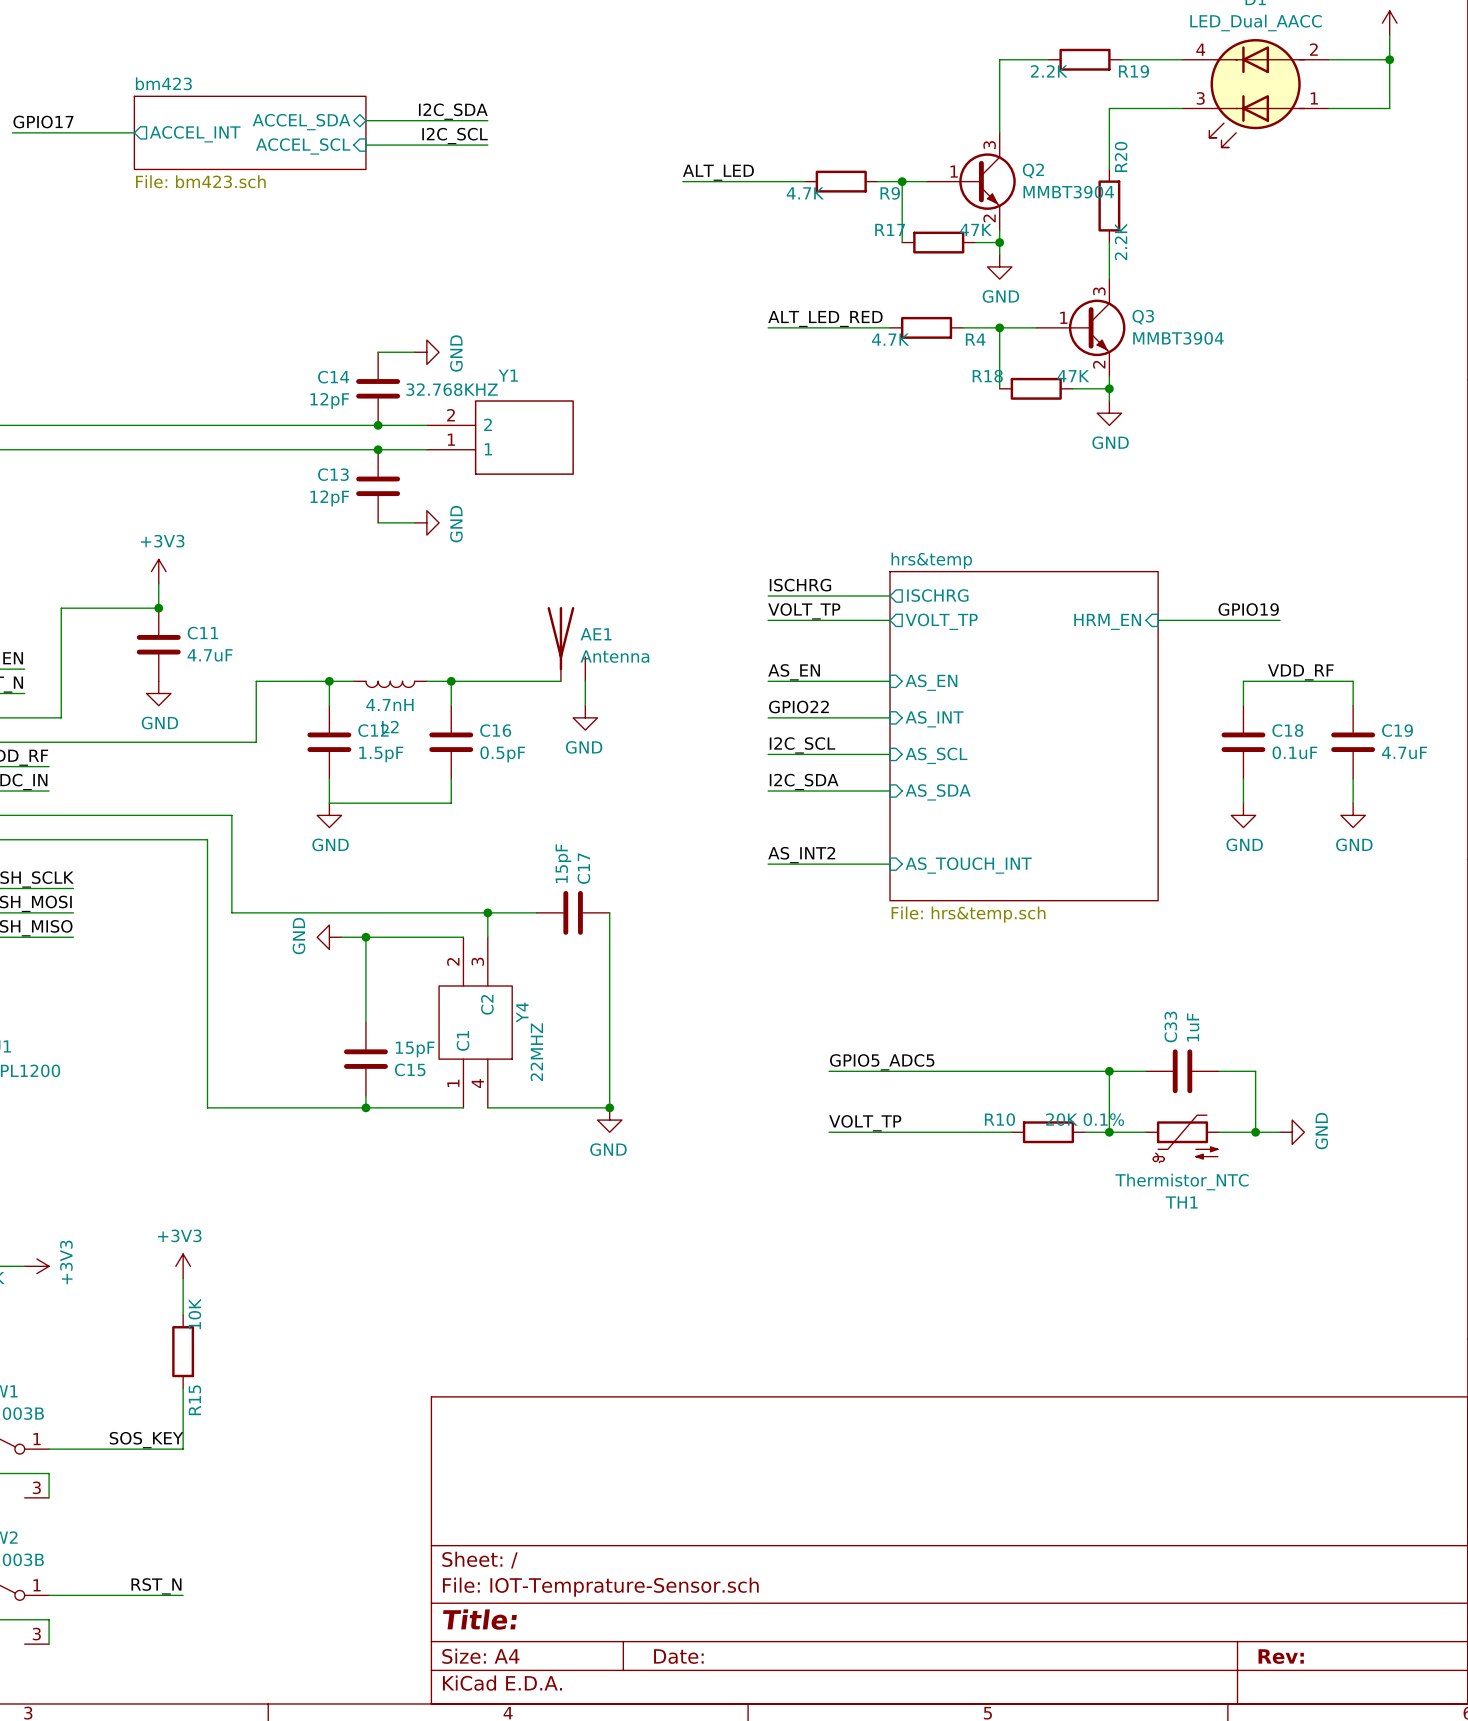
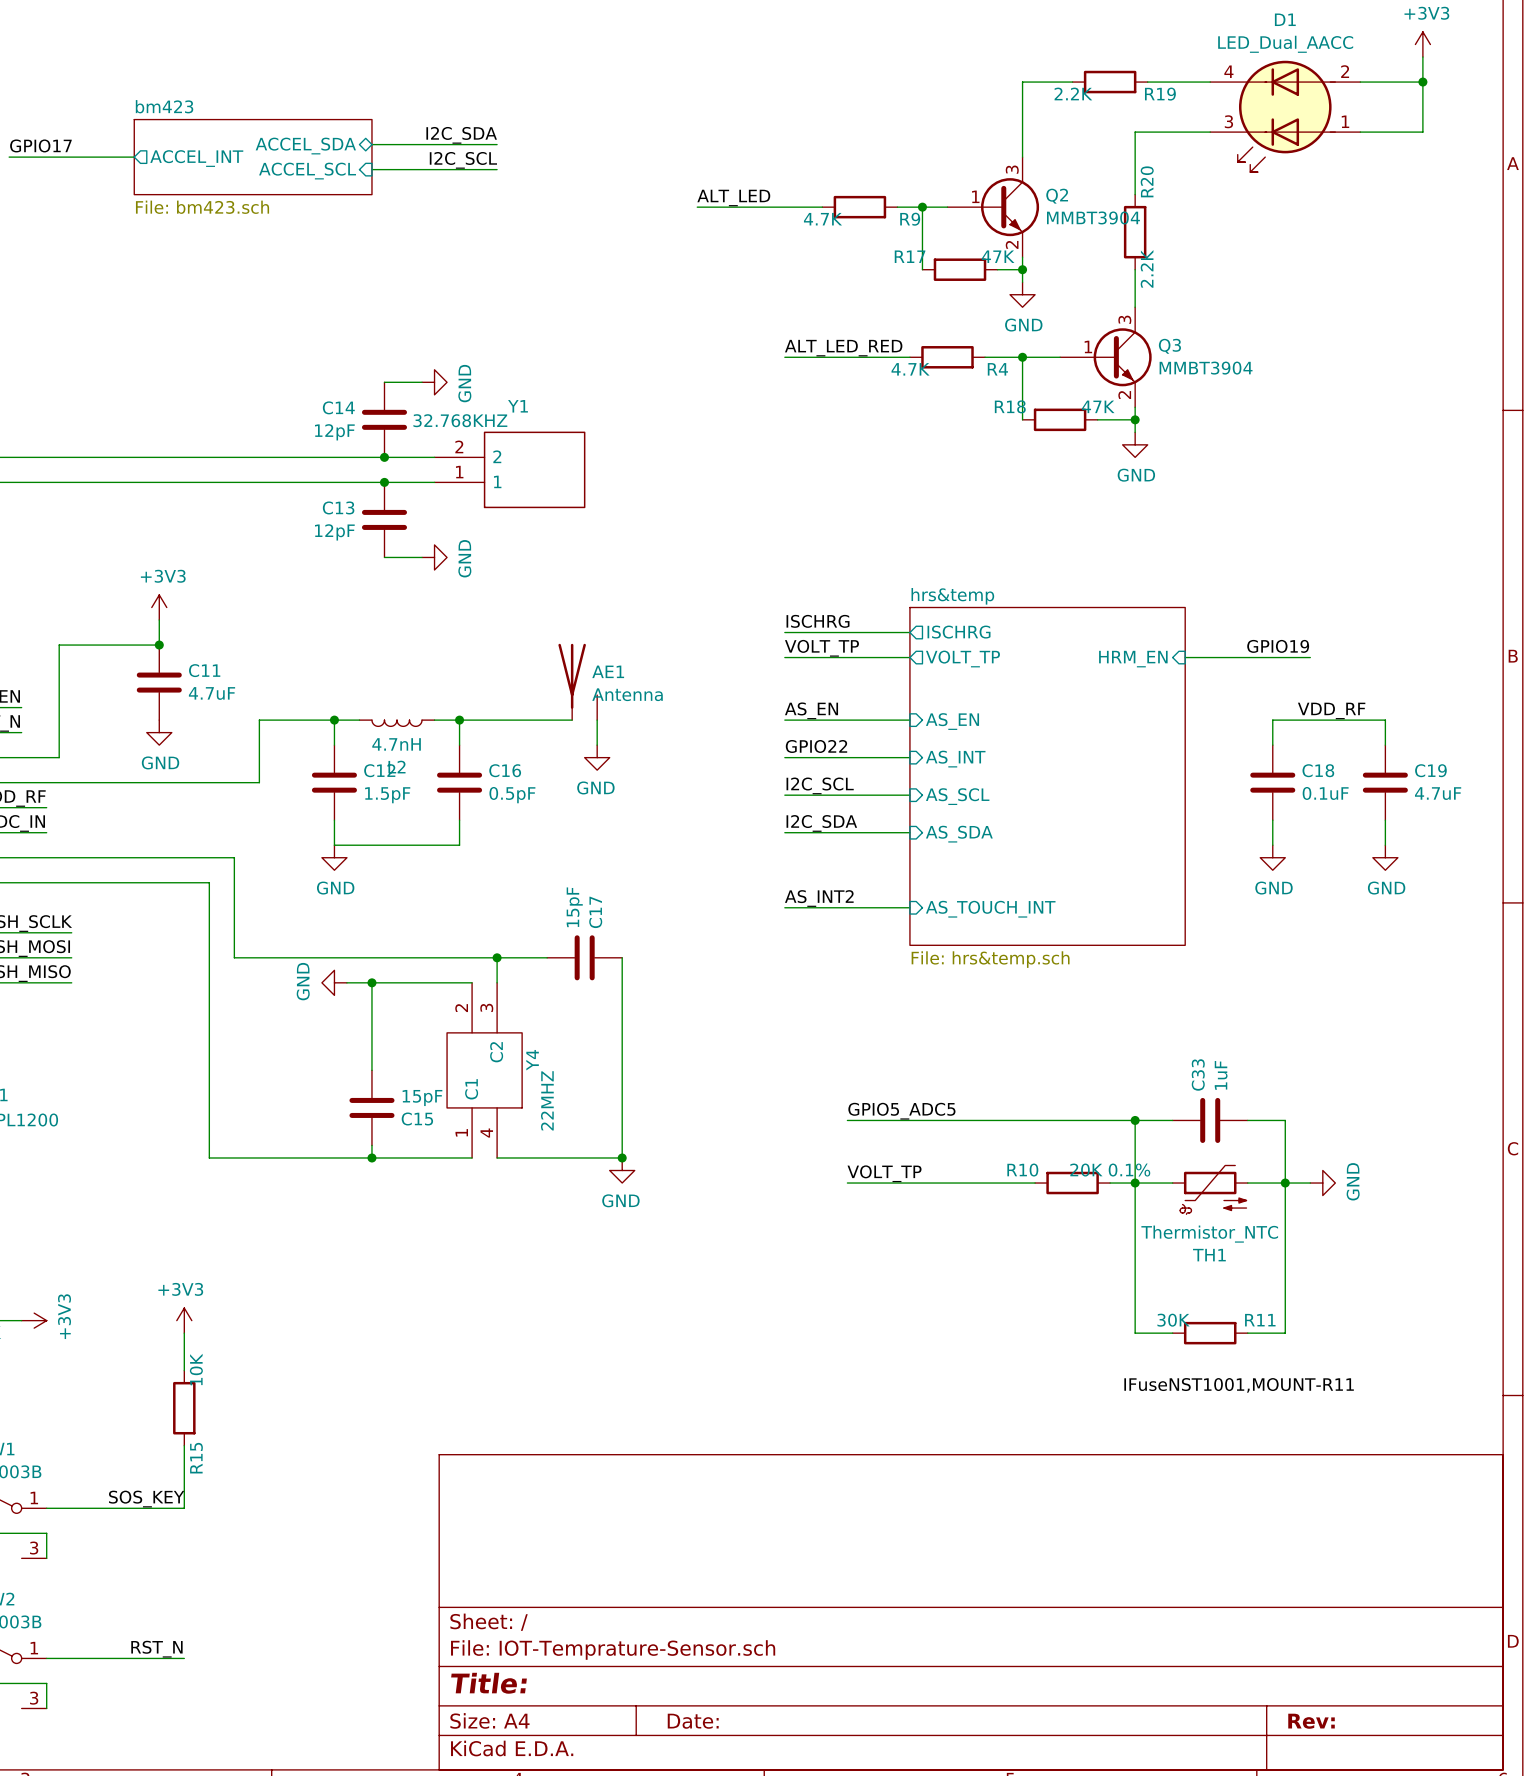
wire: none -> (1135, 1183) (1135, 1333) (1172, 1333)
wire: none -> (1285, 1183) (1285, 1333) (1247, 1333)
R11: none -> 30K (1210, 1333)
label: none -> IFuseNST1001,MOUNT-R11 (1239, 1385)

